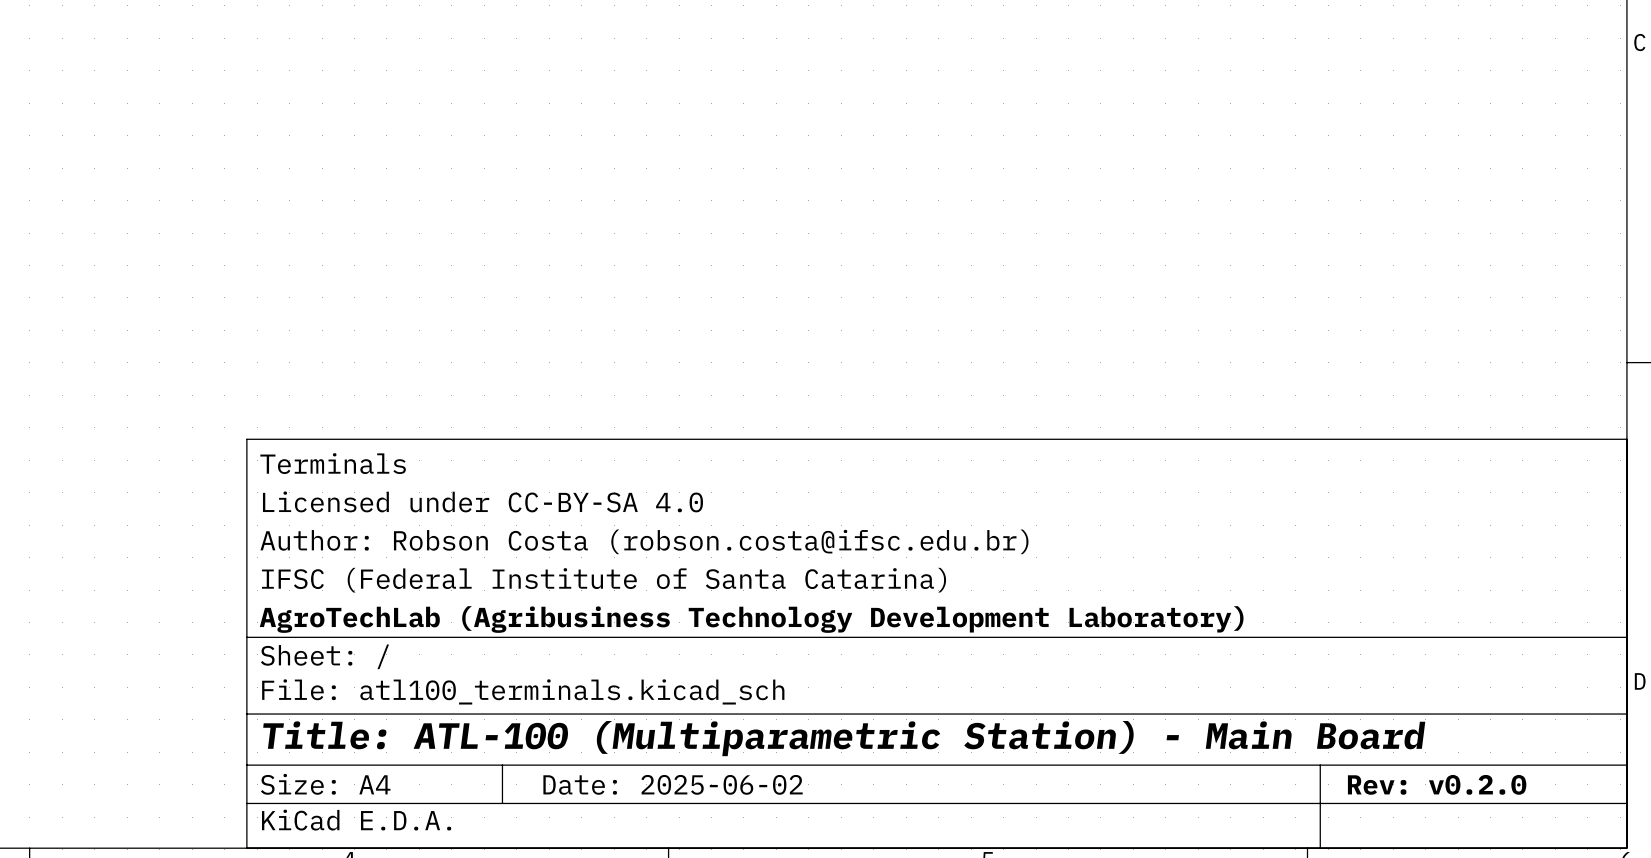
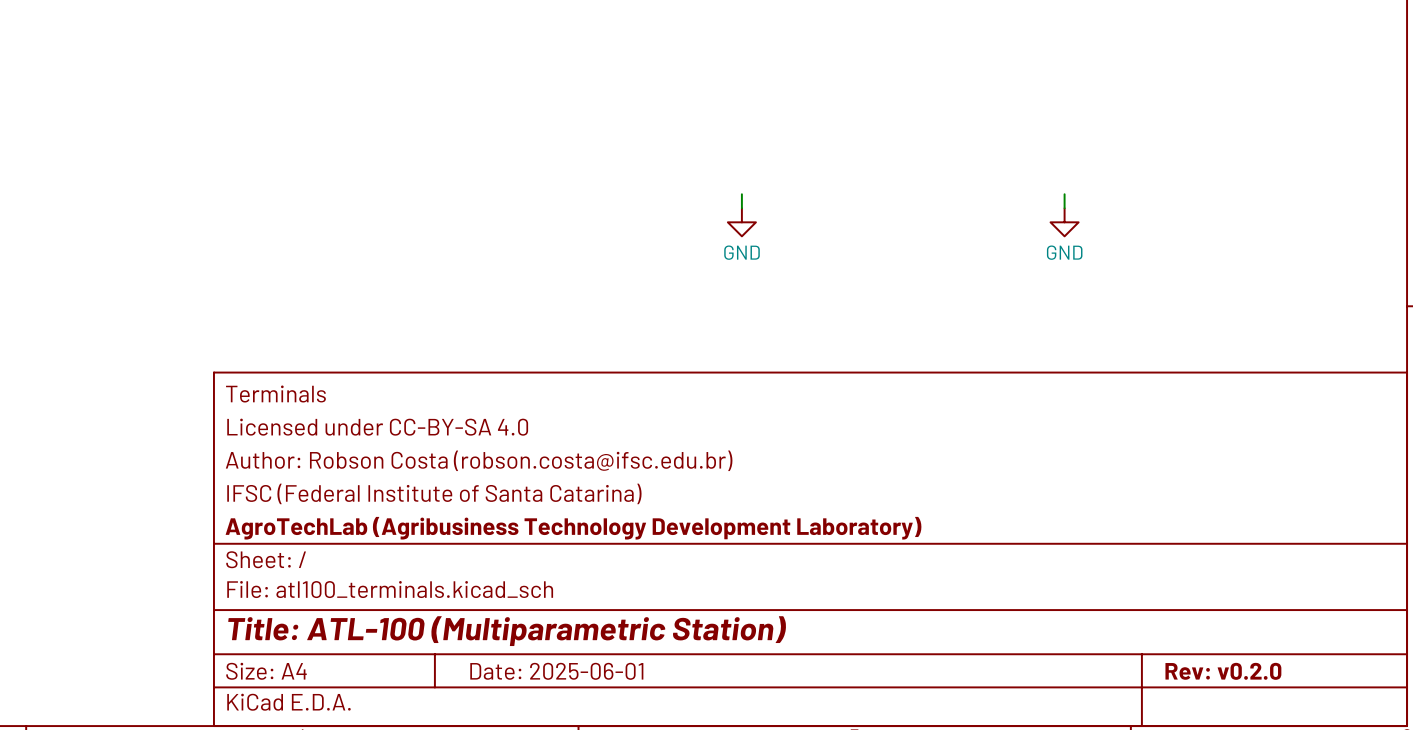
wire: none -> (741, 194) (741, 208)
wire: none -> (1064, 194) (1064, 208)
power symbol: none -> GND (741, 222)
power symbol: none -> GND (1064, 222)
title block: Title: ATL-100 (Multiparametric Station) - Main Board (844, 738) -> Title: ATL-100 (Multiparametric Station) (507, 631)
title block: Date: 2025-06-02 (673, 784) -> Date: 2025-06-01 (556, 671)

